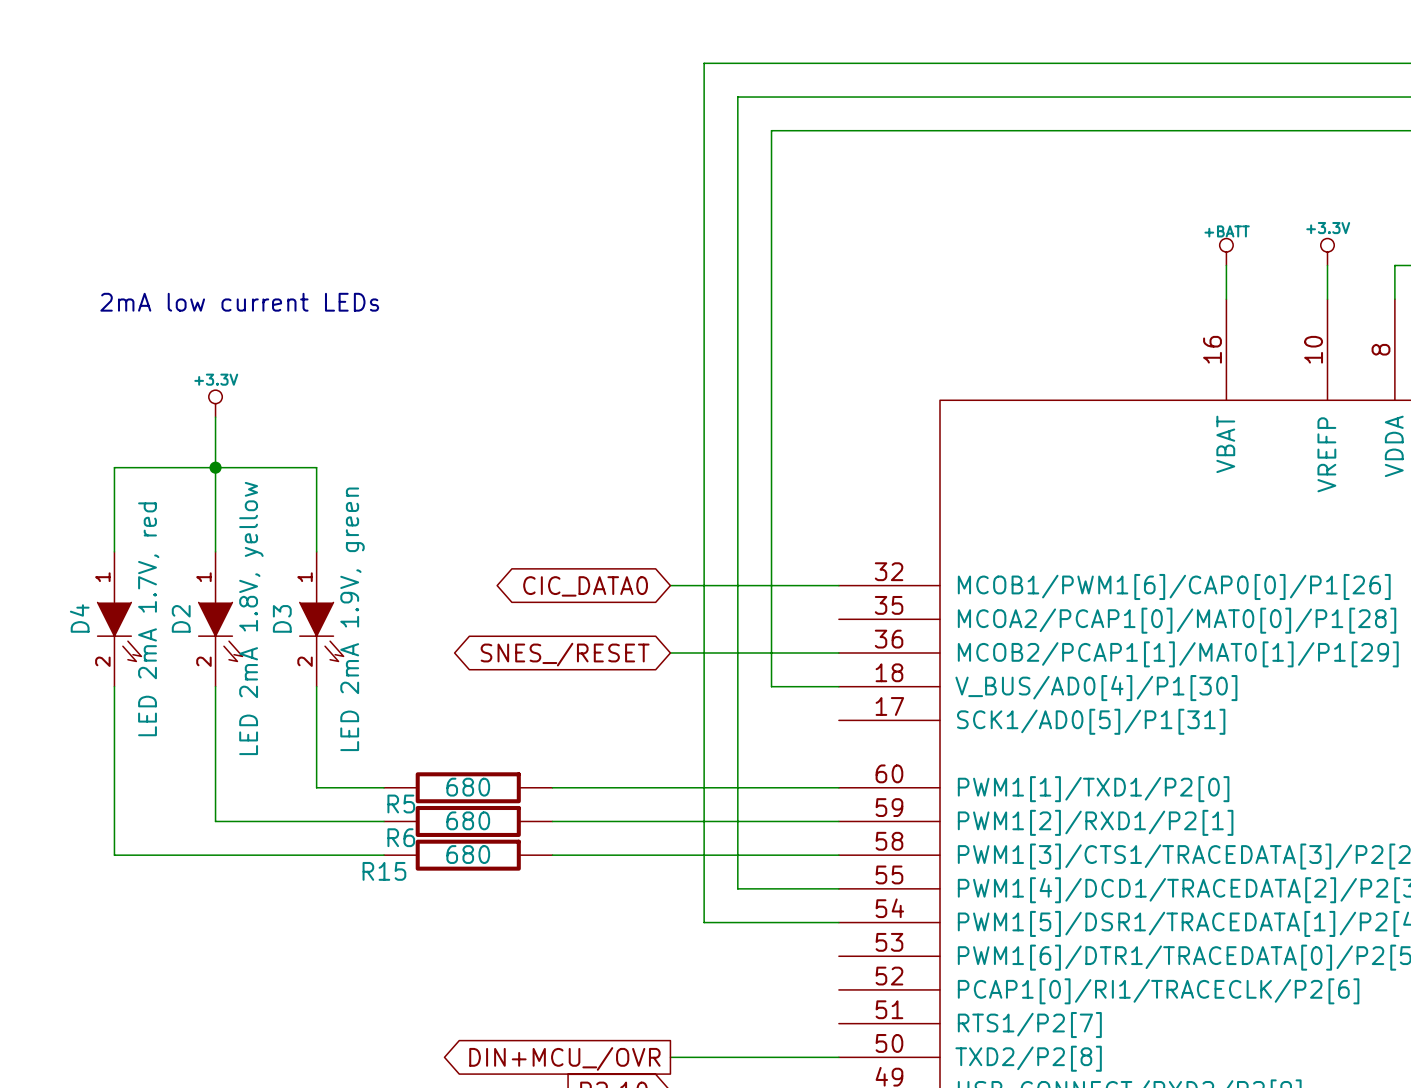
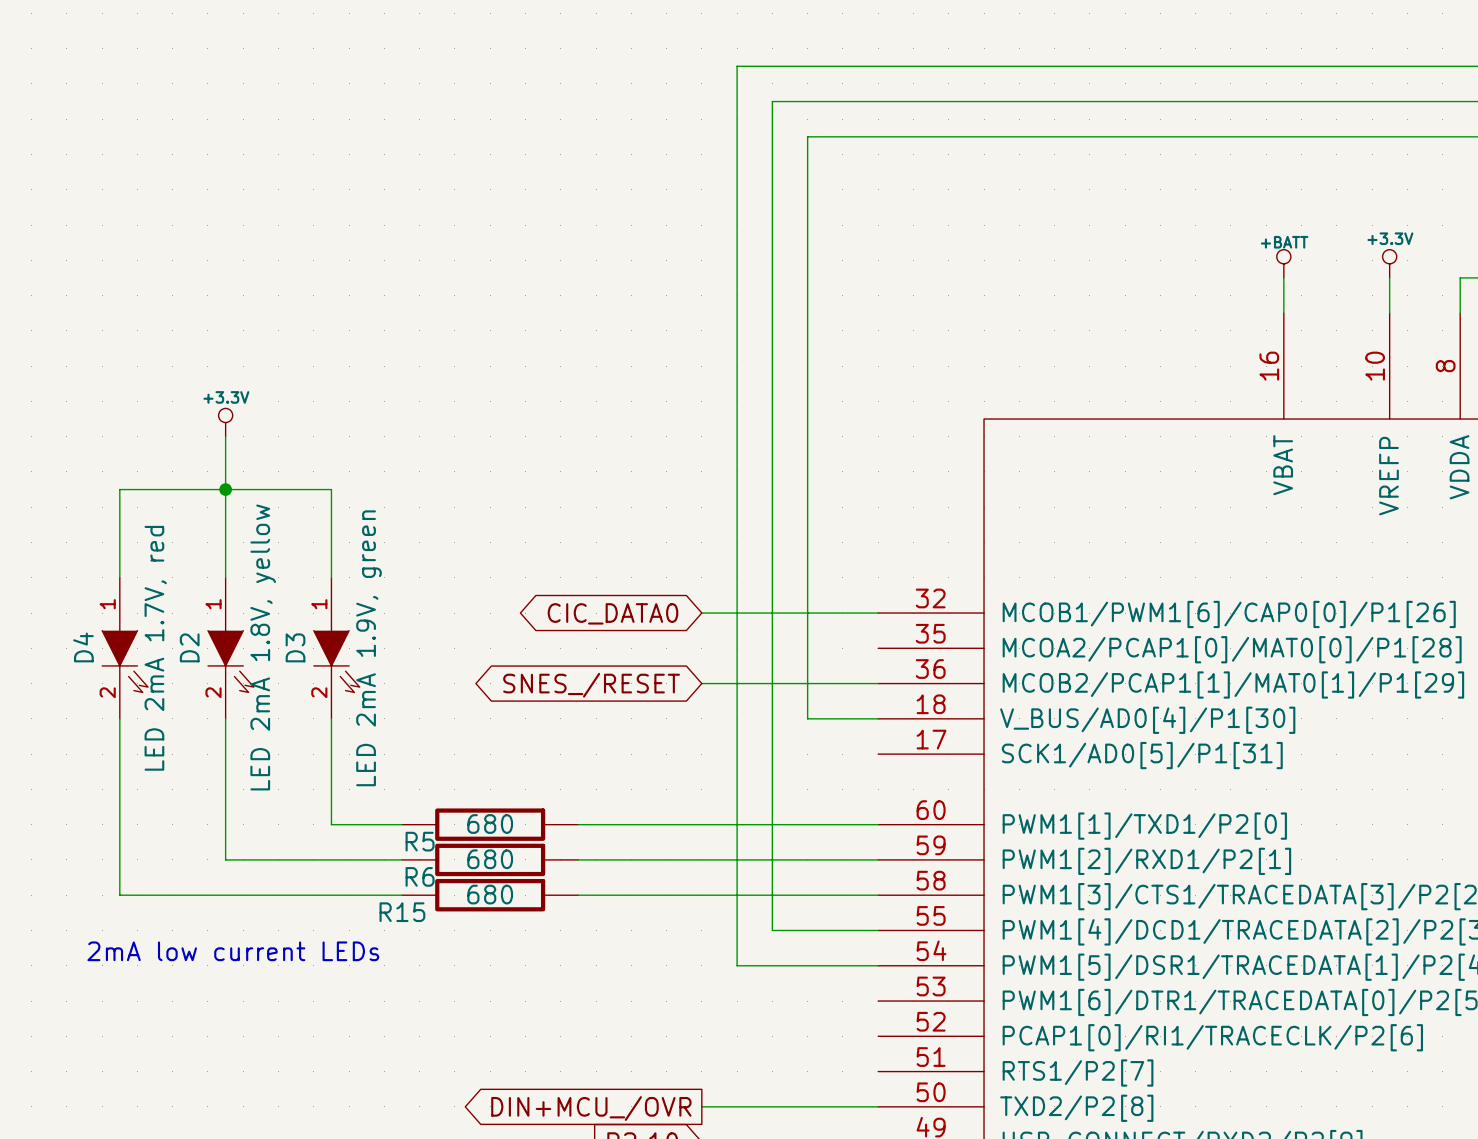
text: 2mA low current LEDs (239, 302) -> none
text: none -> 2mA low current LEDs (233, 951)

